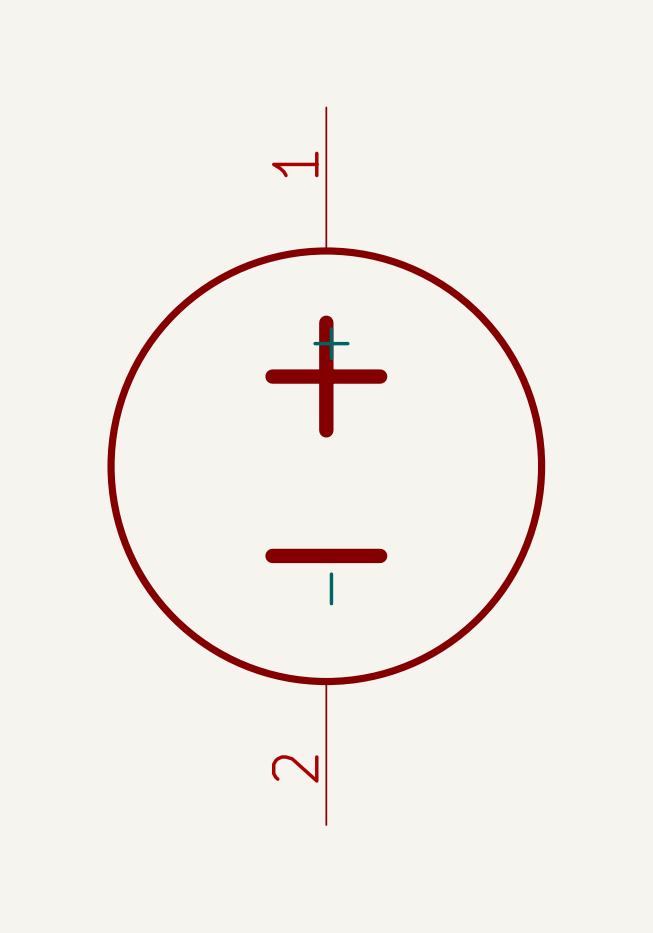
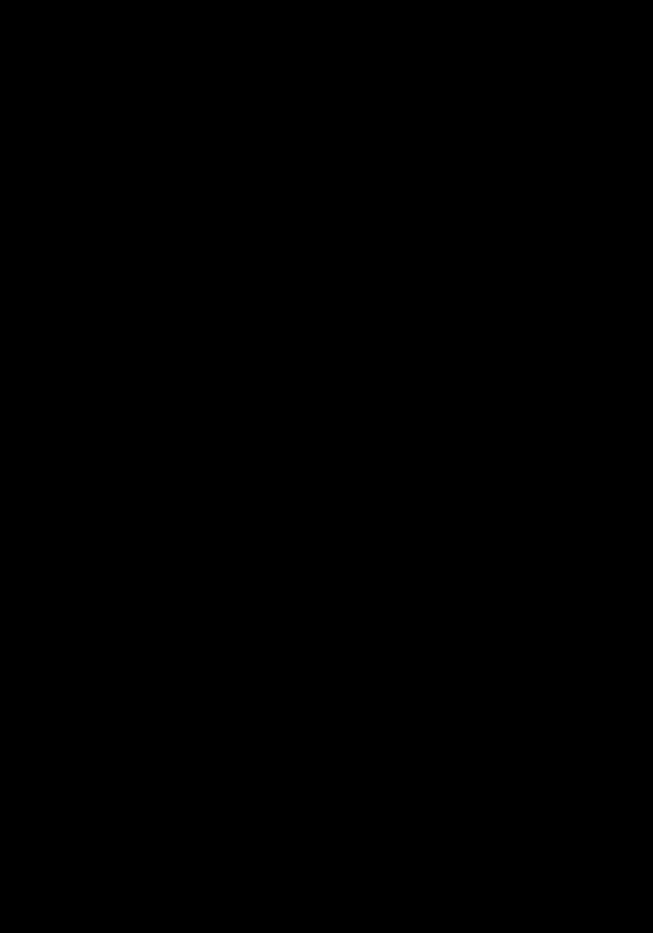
part: (326, 466) -> none

